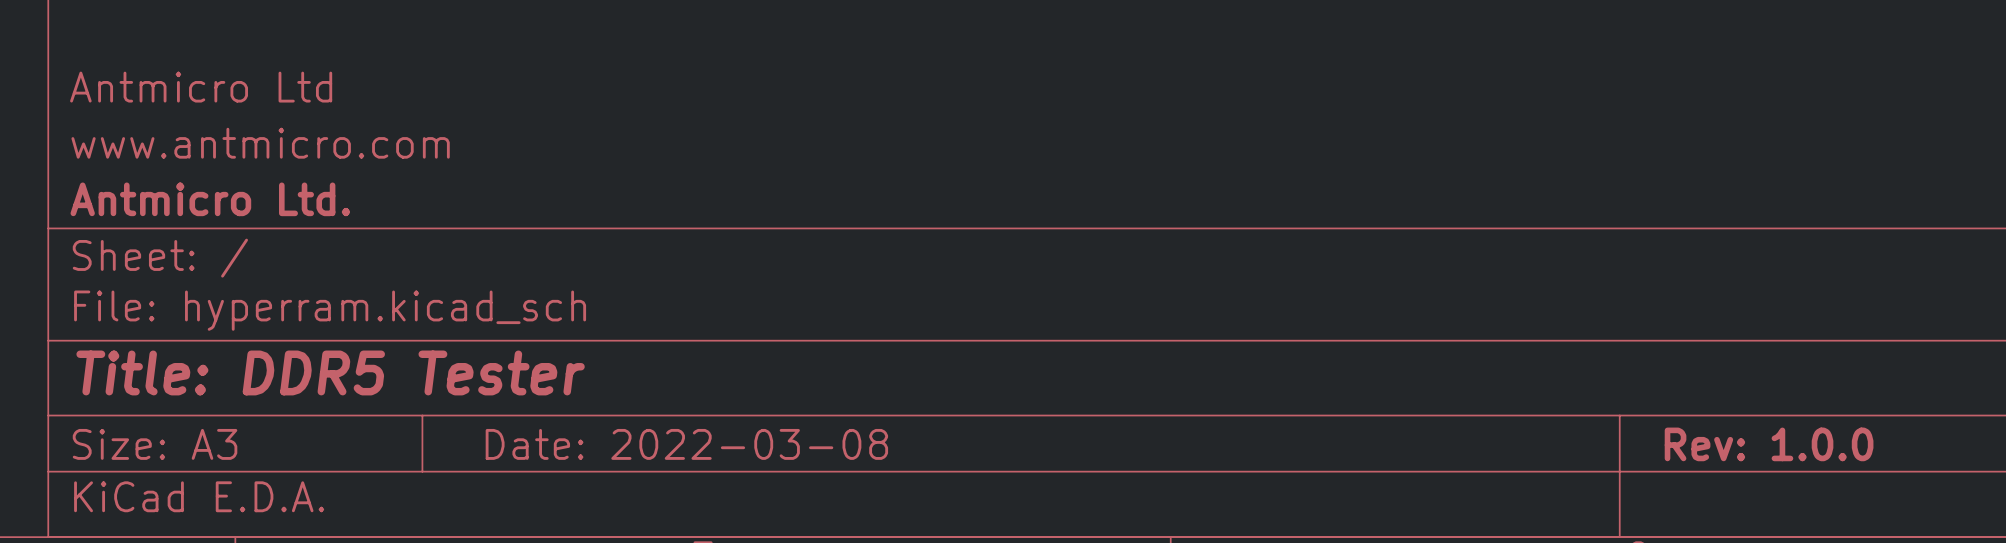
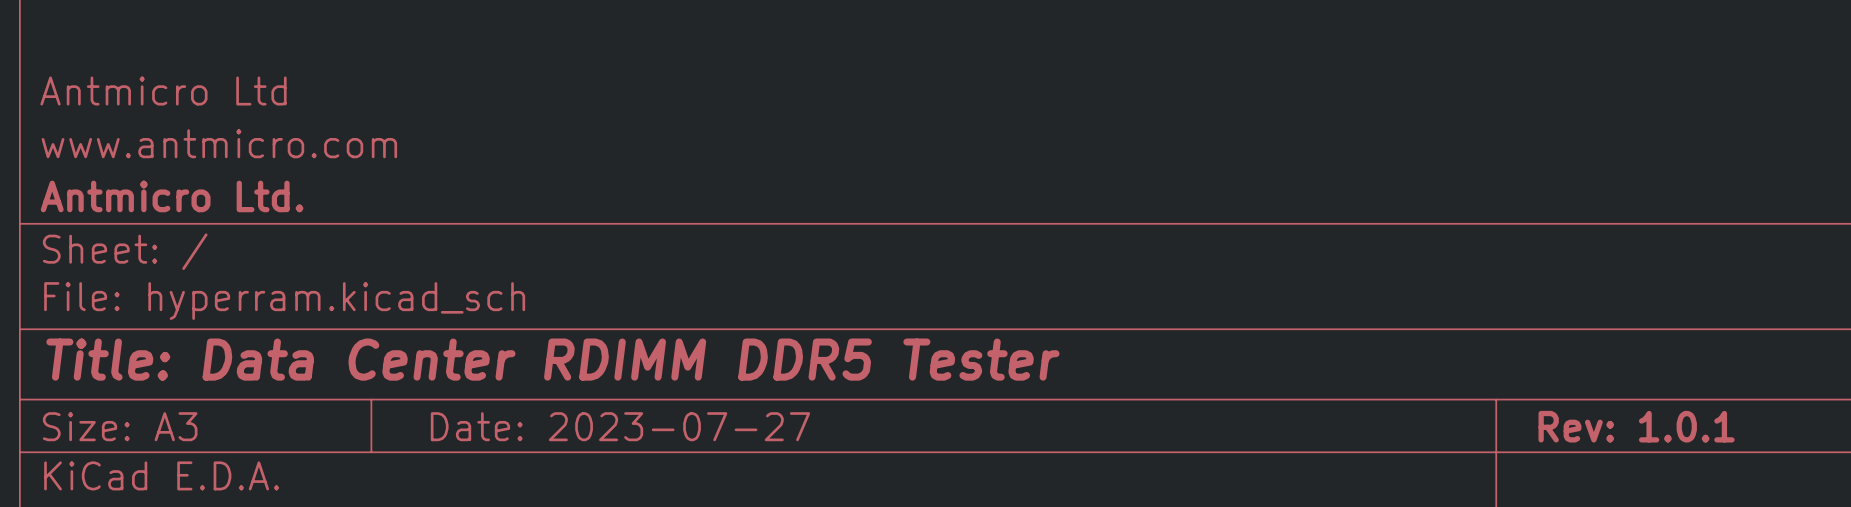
title block: Title: DDR5 Tester (330, 372) -> Title: Data Center RDIMM DDR5 Tester (552, 359)
title block: Date: 2022-03-08 (686, 444) -> Date: 2023-07-27 (620, 426)
title block: Rev: 1.0.0 (1769, 444) -> Rev: 1.0.1 (1636, 426)

